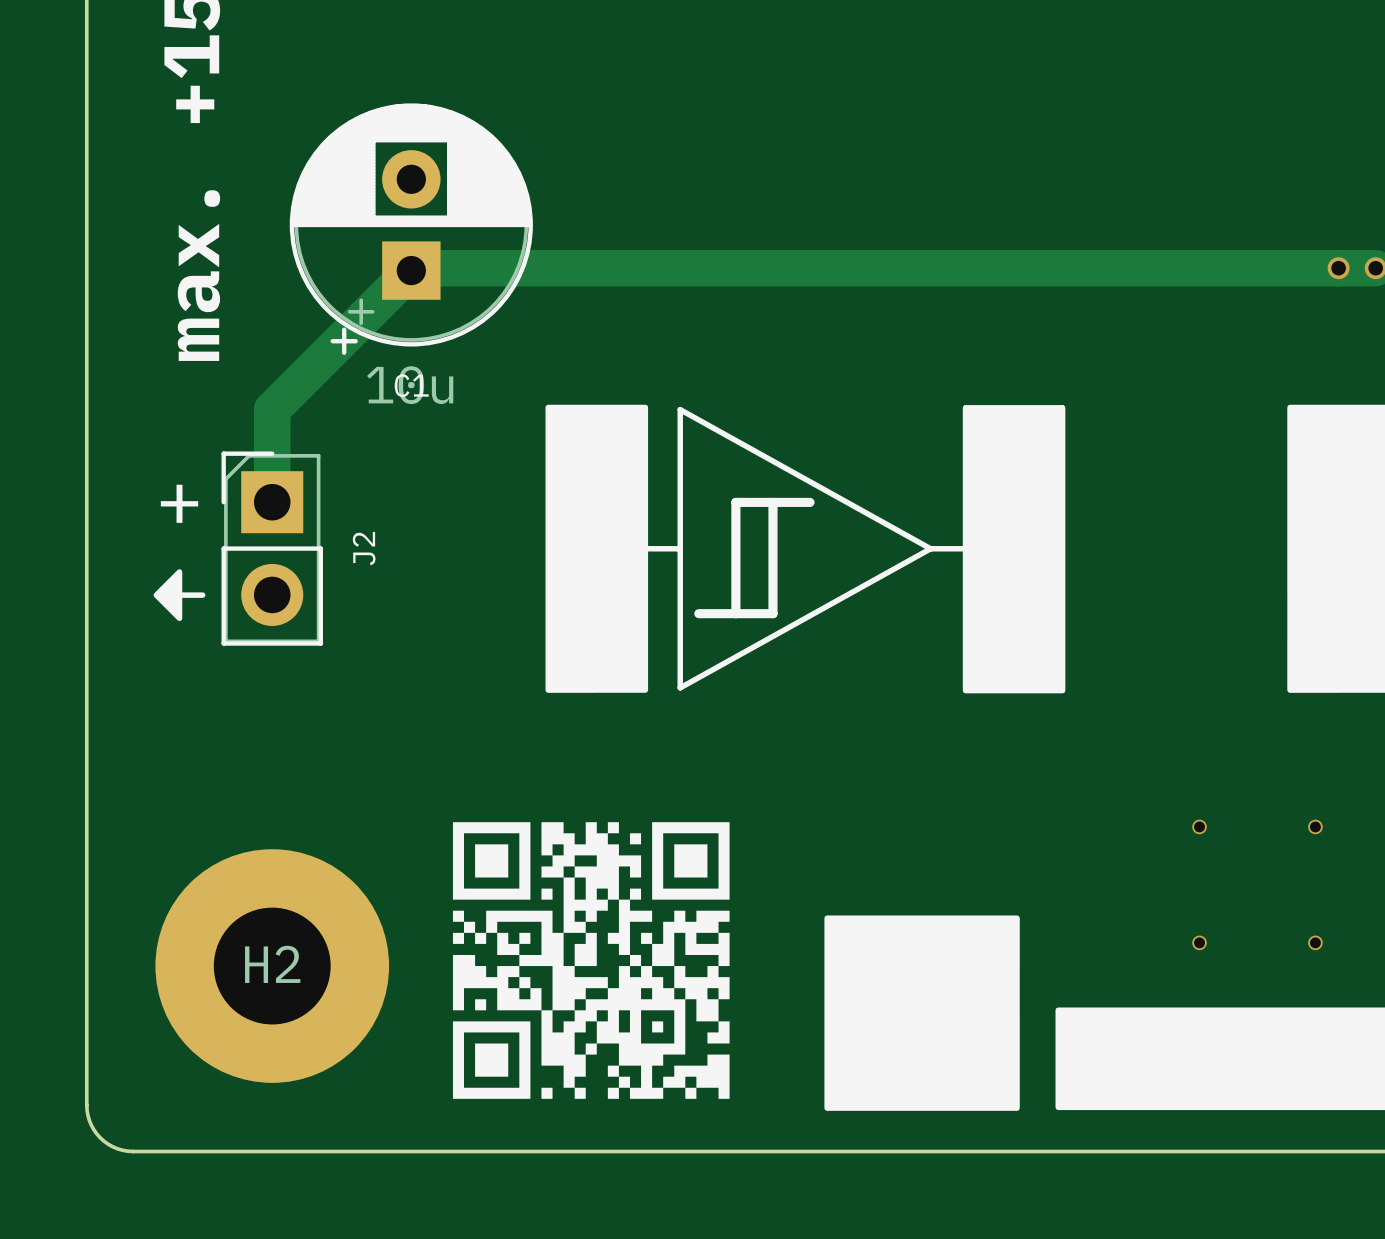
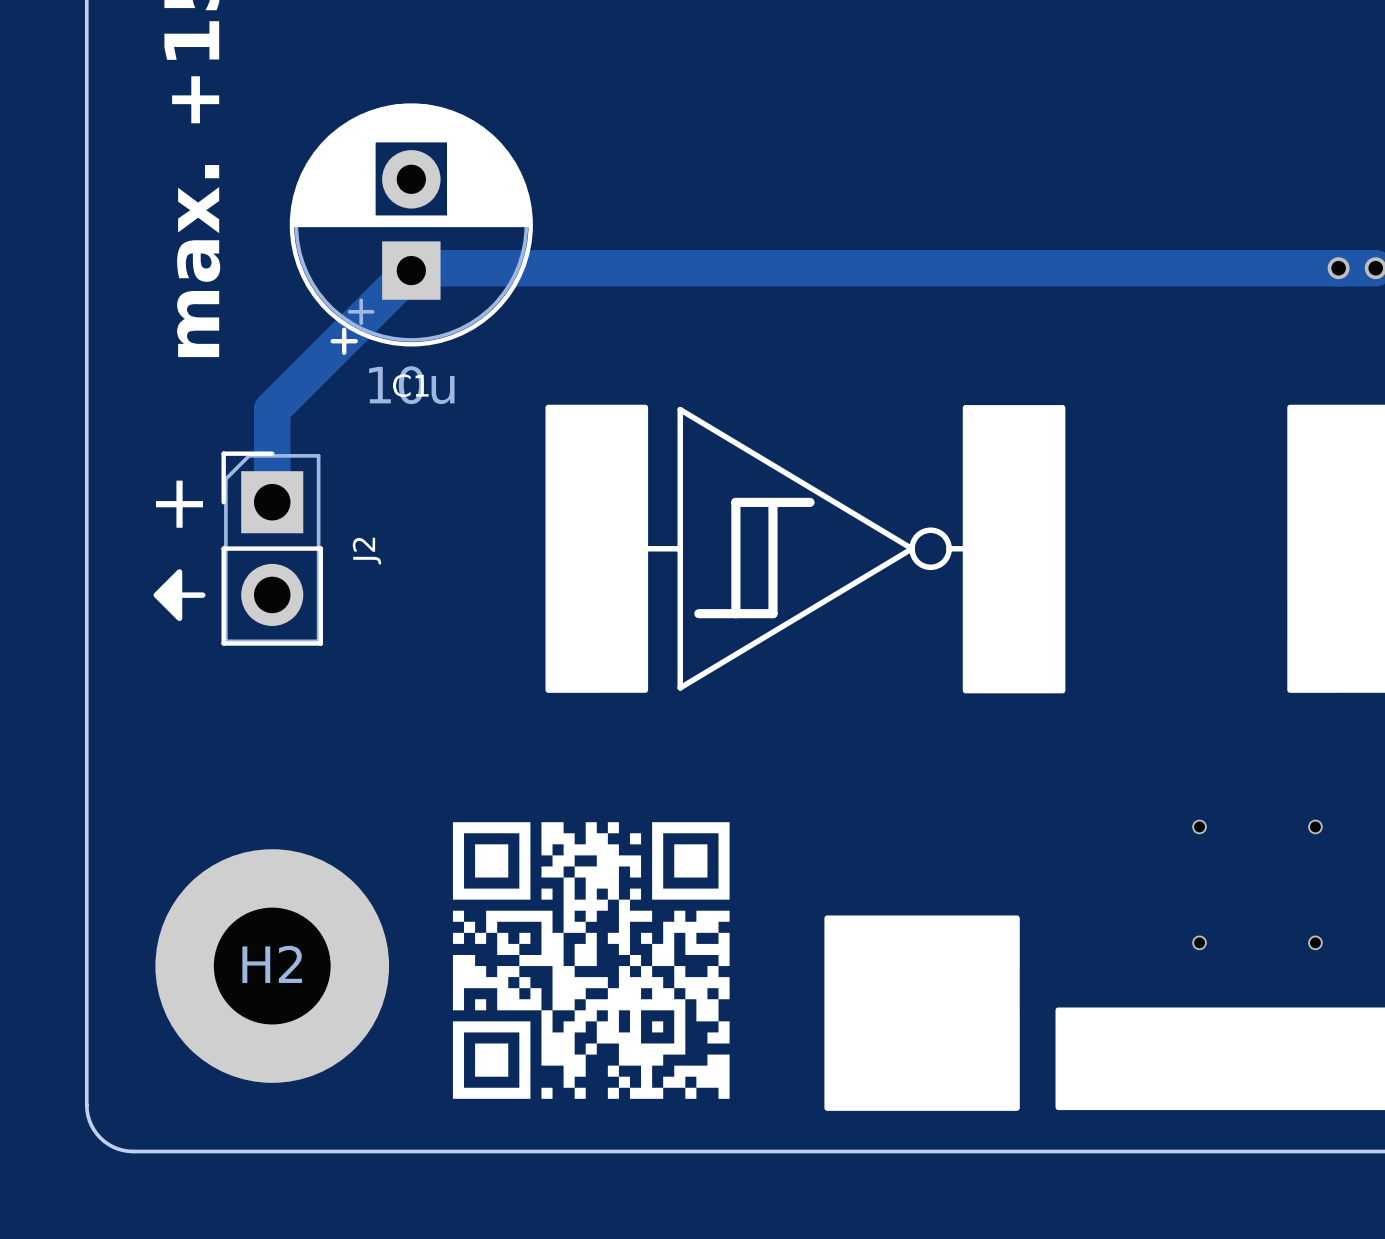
line: (680, 409) (930, 548) -> none
drawing: none -> [909, 527, 952, 571]
line: (930, 548) (680, 687) -> (680, 409) (912, 548) (680, 687)
line: (930, 548) (949, 548) -> none

